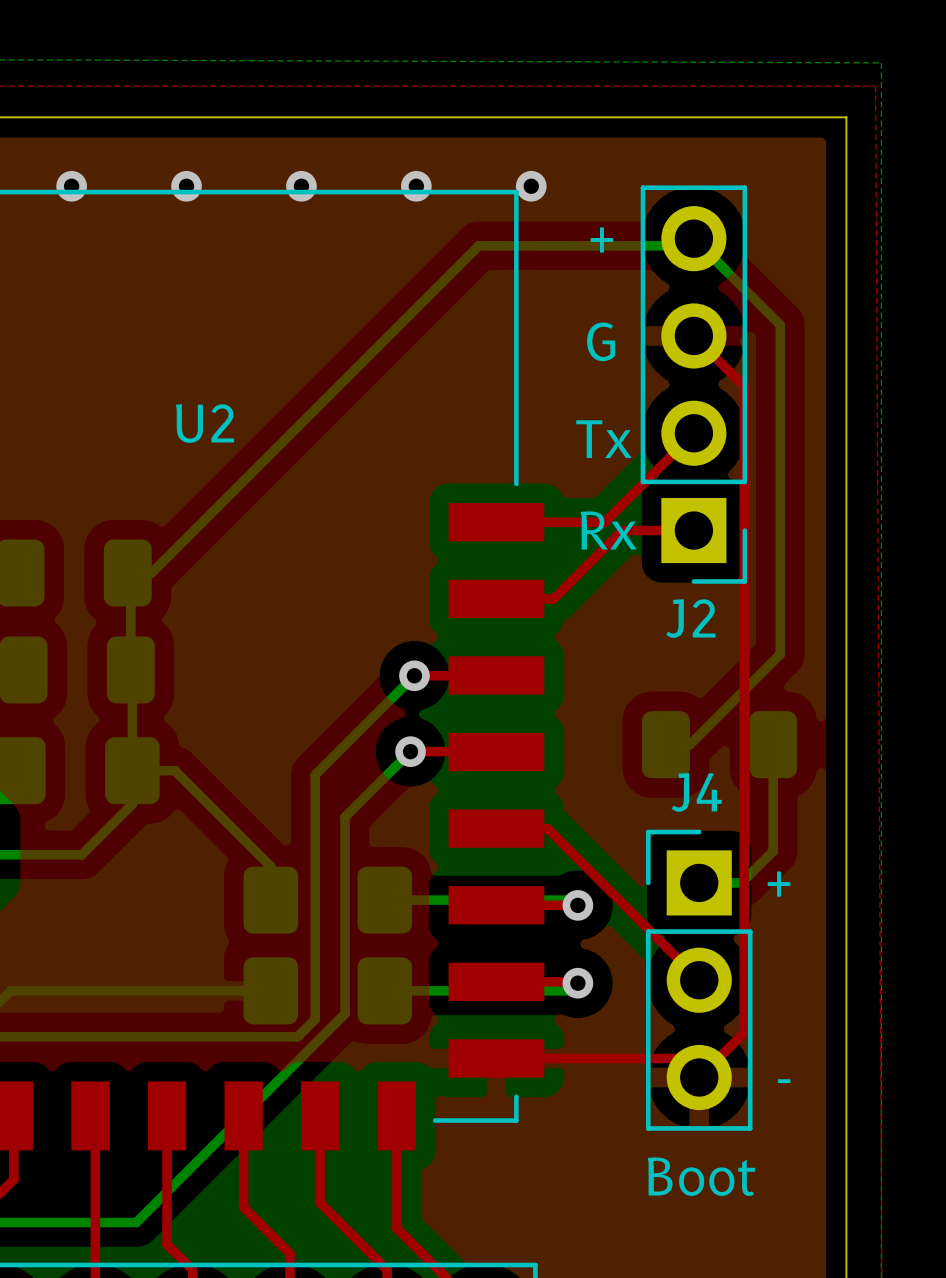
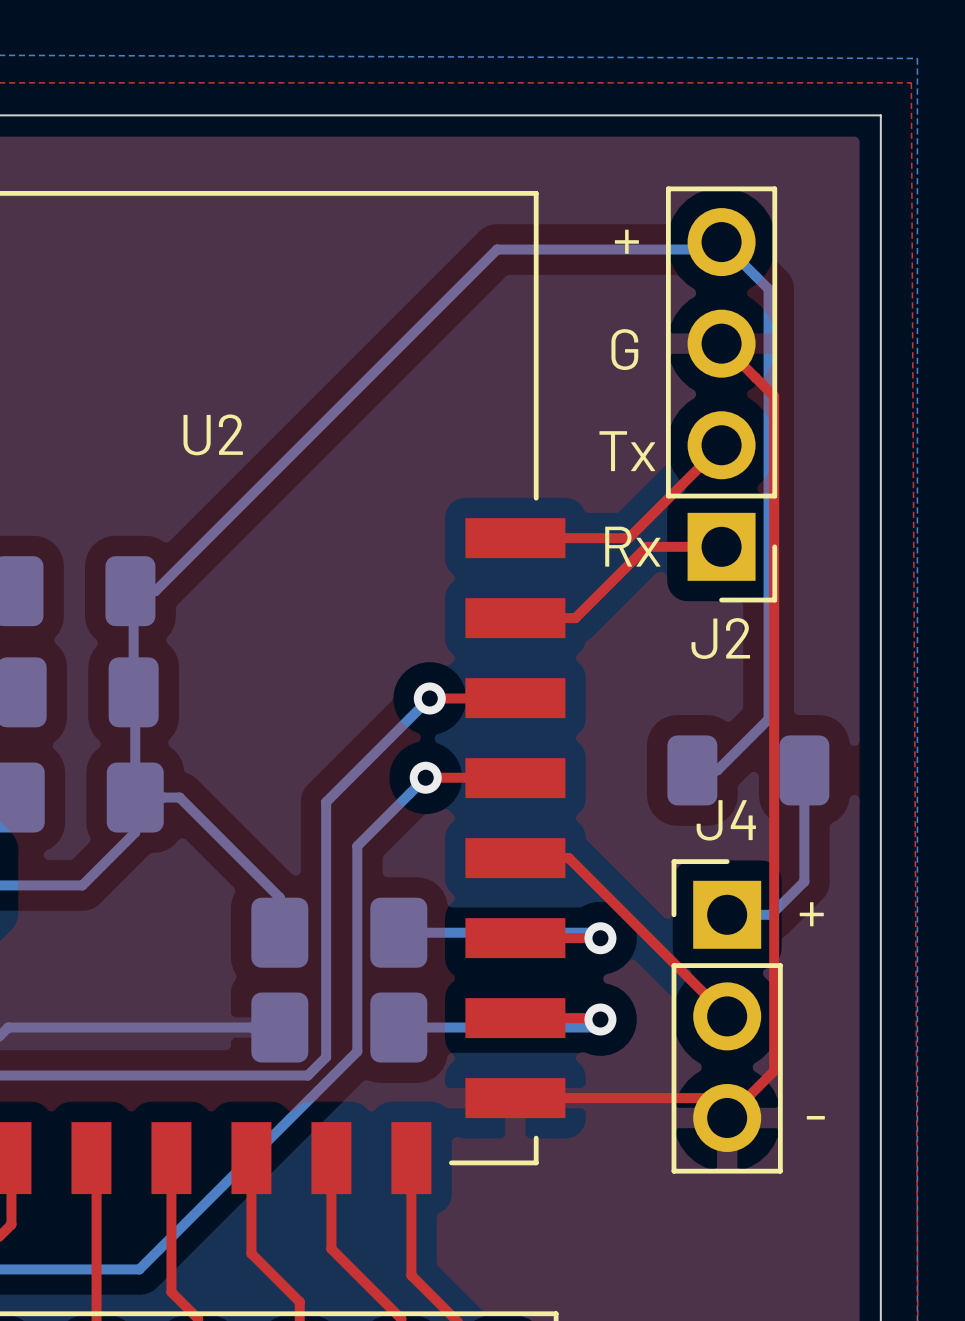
via: (71, 186) -> none
via: (186, 186) -> none
via: (301, 186) -> none
via: (416, 186) -> none
via: (531, 186) -> none
bottom track: (738, 283) (780, 325) (780, 654) (738, 695) -> (768, 289) (768, 719)
text: Boot (701, 1176) -> none

